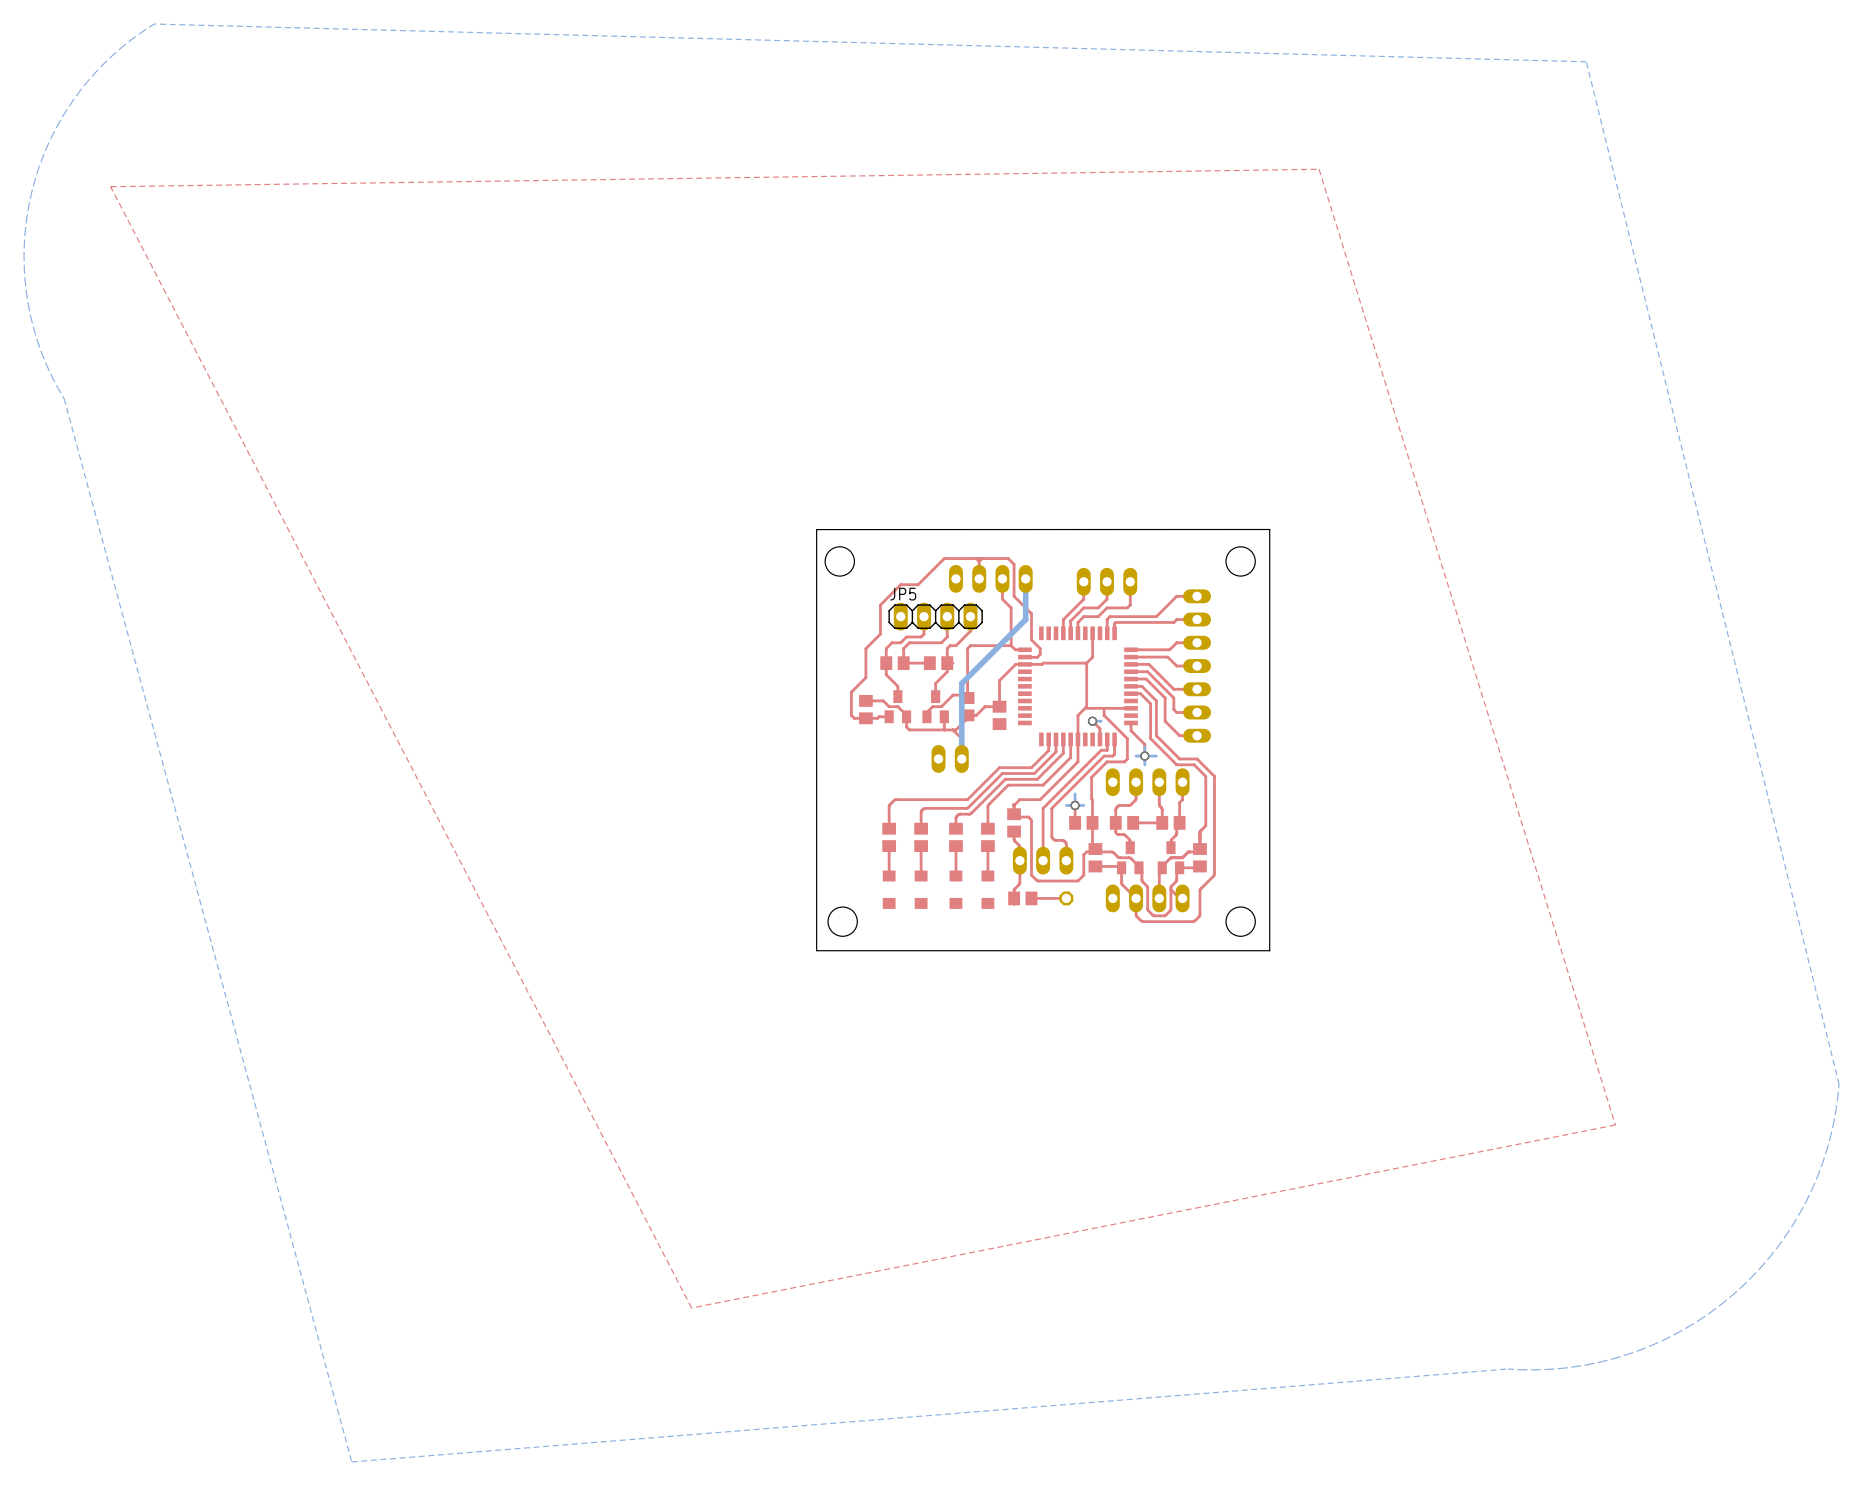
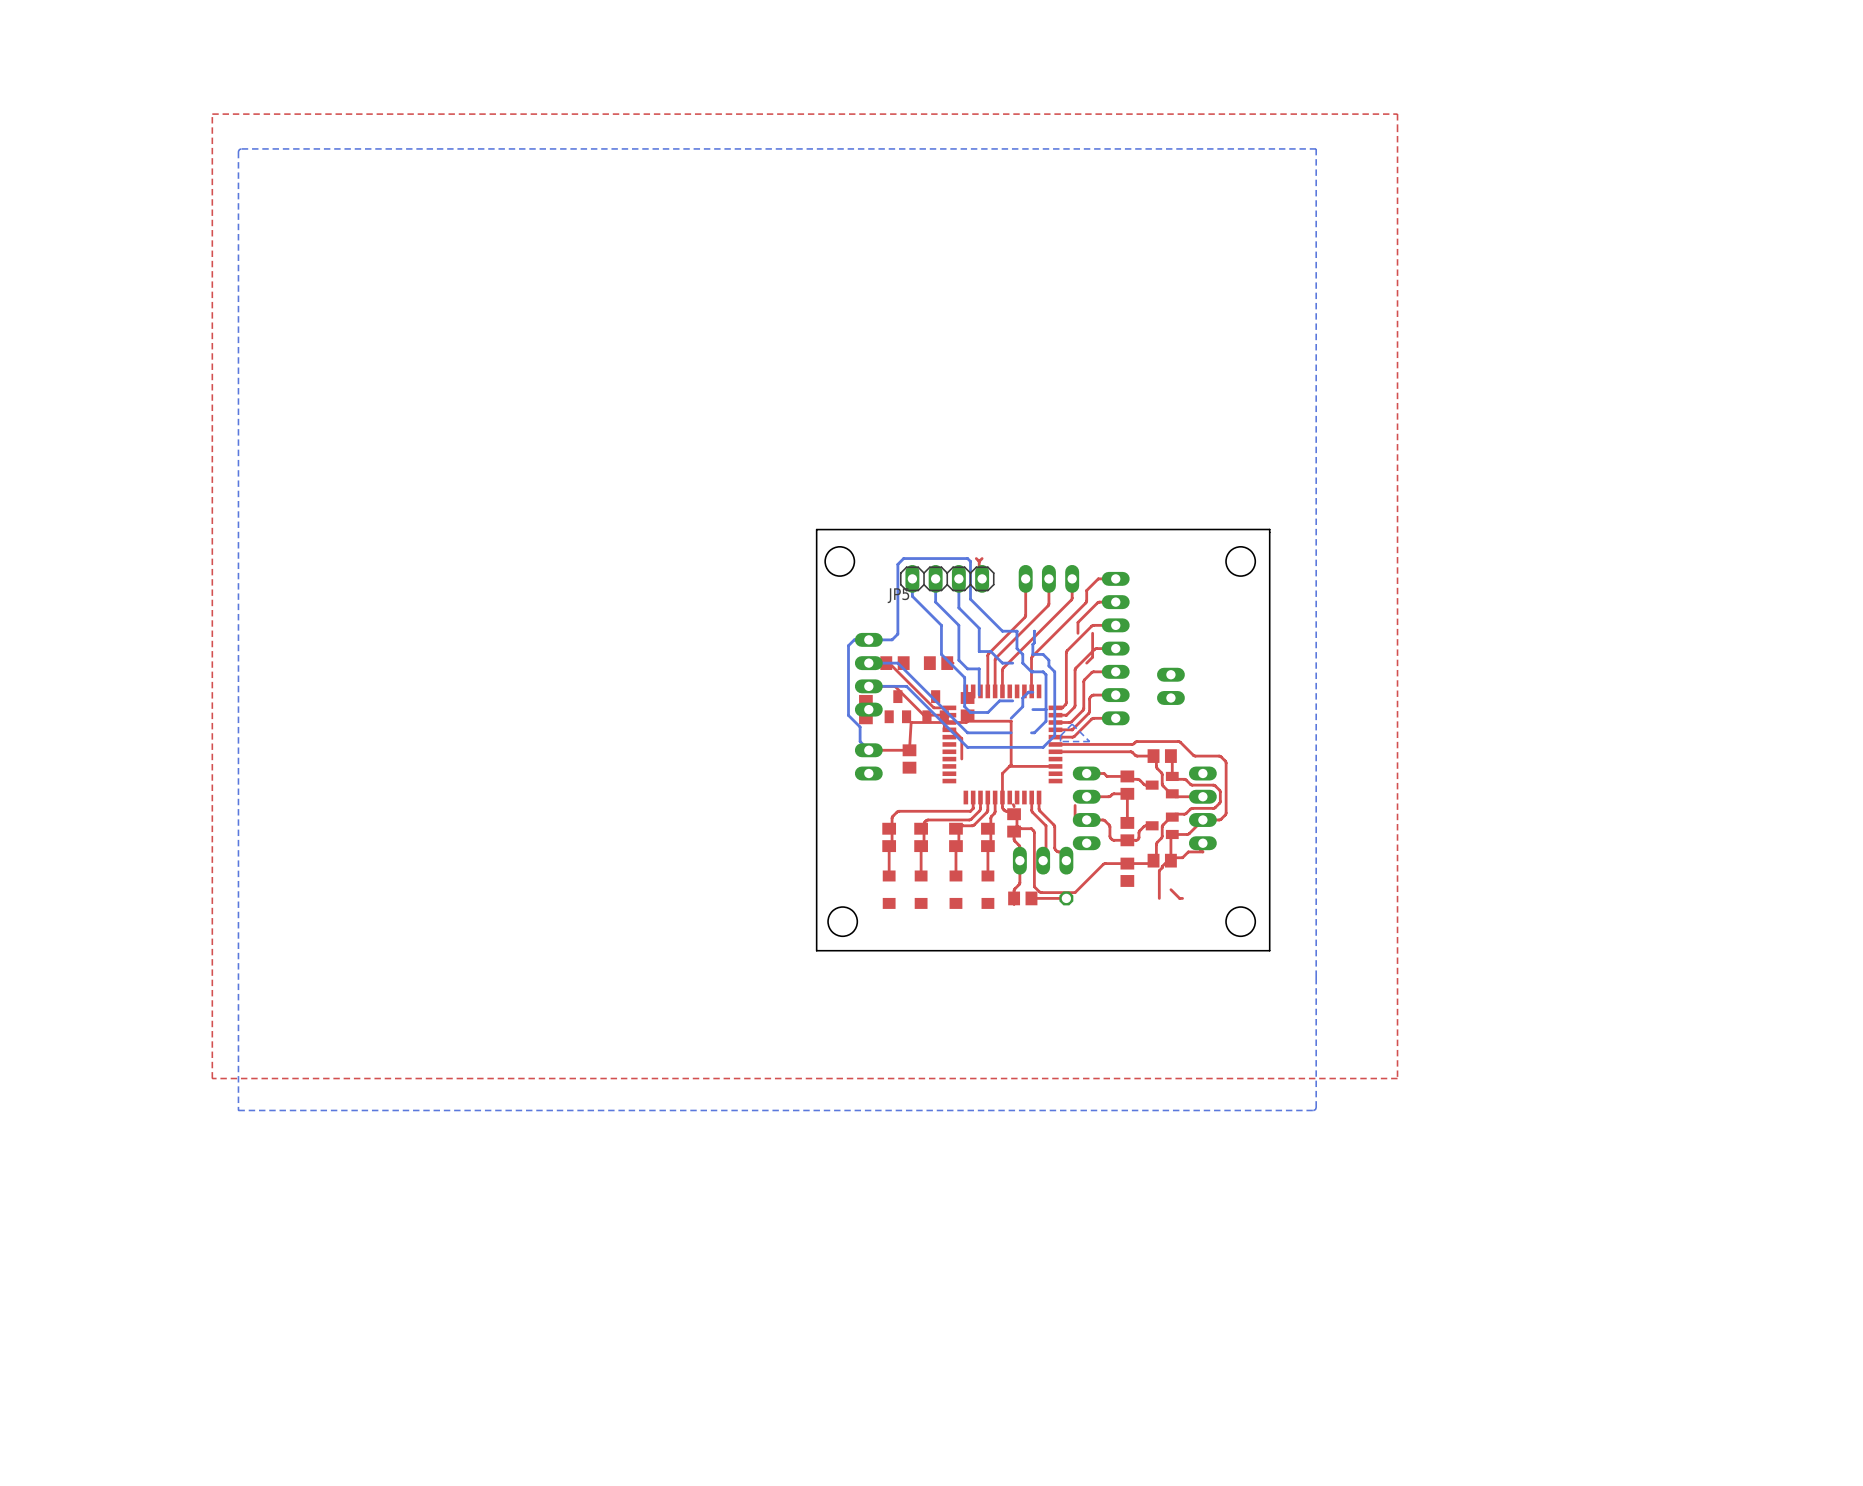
bottom zone outline: (154, 24) (1586, 61) (1839, 1084) (1833, 1124) (1822, 1163) (1806, 1200) (1778, 1246) (1742, 1286) (1722, 1303) (1688, 1326) (1652, 1344) (1627, 1354) (1575, 1366) (1534, 1369) (1507, 1369) (351, 1461) (64, 398) (41, 353) (30, 317) (26, 292) (24, 255) (28, 205) (38, 168) (53, 133) (72, 101) (96, 71) (123, 45) (154, 24) -> none
bottom zone outline: none -> (1316, 148) (1315, 1109) (238, 1110) (239, 149) (1316, 148)
top zone outline: (1319, 169) (1615, 1125) (691, 1308) (110, 186) (1319, 169) -> (1397, 114) (1397, 1078) (212, 1078) (212, 114) (1397, 114)
bottom track: none -> (912, 578) (912, 596) (941, 625) (941, 654) (964, 677) (964, 706) (970, 712) (987, 712) (999, 700) (1012, 700)
bottom track: none -> (935, 578) (935, 602) (958, 625) (958, 660) (967, 668) (979, 668) (979, 695)
bottom track: none -> (958, 578) (958, 607) (979, 628) (979, 651) (990, 651) (1002, 663) (1012, 663)
part: (990, 578) -> none
top track: (1002, 578) (1002, 599) (1011, 607) (1011, 645) -> none
top track: none -> (1025, 578) (1025, 616) (988, 654) (987, 691)
bottom track: (1025, 578) (1025, 619) (961, 683) (961, 758) -> none
top track: none -> (1048, 578) (1048, 605) (995, 658) (995, 691)
top track: none -> (1072, 578) (1071, 599) (1002, 668) (1002, 691)
top track: none -> (1115, 578) (1098, 578) (1086, 590) (1086, 602) (1032, 656) (1031, 691)
top track: (1083, 581) (1083, 599) (1063, 619) (1063, 633) -> none
top track: (1107, 581) (1107, 599) (1098, 607) (1083, 607) (1070, 621) (1070, 633) -> none
part position: (1107, 581) -> (1048, 578)
top track: (1130, 581) (1130, 605) (1127, 607) (1107, 607) (1098, 616) (1083, 616) -> (1115, 602) (1098, 602) (1083, 616)
top track: (1197, 596) (1176, 596) (1156, 616) (1109, 616) (1107, 619) (1107, 633) -> none
top track: (924, 616) (924, 634) (921, 636) (906, 636) (900, 642) (892, 642) (886, 648) (886, 674) (897, 686) (897, 696) -> none
JP5 position: (935, 616) -> (947, 578)
top track: (947, 616) (947, 636) (941, 642) (909, 642) (903, 648) (903, 663) (929, 663) -> none
top track: (970, 616) (970, 631) (955, 645) (950, 645) (947, 648) (947, 671) (935, 683) (935, 696) -> none
top track: (1197, 619) (1176, 619) (1173, 622) (1115, 622) (1114, 633) -> none
top track: none -> (1115, 625) (1092, 625) (1066, 650) (1066, 703) (1062, 707) (1055, 707)
bottom track: none -> (1034, 631) (1032, 654) (1043, 654) (1048, 660) (1048, 666) (1054, 671) (1054, 735) (1043, 747) (967, 747) (906, 686) (868, 686)
top track: (1197, 642) (1176, 642) (1169, 649) (1131, 649) -> none
top track: (1011, 645) (1015, 649) (1024, 649) -> none
top track: (1011, 645) (970, 645) (967, 648) (967, 695) -> none
top track: none -> (1115, 648) (1095, 648) (1075, 668) (1074, 706) (1066, 715) (1055, 715)
top track: (1024, 657) (1037, 657) (1040, 654) (1040, 648) (1031, 639) (1031, 613) (1014, 596) (1014, 564) (1008, 558) (944, 558) (918, 584) (900, 584) (880, 605) (880, 634) (865, 648) (865, 677) (851, 692) (851, 715) (854, 718) (889, 716) -> none
top track: (1131, 657) (1167, 657) (1176, 666) (1197, 666) -> none
top track: none -> (868, 663) (889, 663) (933, 707) (949, 707)
bottom track: none -> (868, 663) (897, 663) (967, 732) (1011, 732)
top track: (1131, 664) (1148, 664) (1173, 689) (1197, 689) -> none
part position: (1197, 666) -> (1115, 648)
top track: (1131, 671) (1147, 671) (1173, 697) (1173, 709) (1176, 712) (1197, 712) -> none
part: none -> (868, 674)
top track: (1131, 679) (1146, 679) (1165, 697) (1165, 721) (1179, 735) (1197, 735) -> none
top track: none -> (868, 686) (894, 686) (923, 715) (949, 715)
part position: (1077, 686) -> (1002, 744)
top track: (1131, 686) (1141, 686) (1156, 700) (1156, 735) (1179, 758) (1197, 758) (1214, 776) (1214, 874) (1200, 889) (1199, 915) (1194, 921) (1142, 921) (1136, 915) (1136, 898) (1121, 883) (1121, 867) (1095, 866) -> none
part: none -> (1170, 686)
bottom track: none -> (1028, 692) (1022, 697) (1022, 706) (1011, 718)
bottom track: none -> (1032, 692) (1028, 692)
top track: (1131, 693) (1140, 693) (1150, 703) (1150, 738) (1176, 764) (1194, 764) (1205, 776) (1205, 825) (1199, 831) (1199, 851) -> none
top track: (967, 695) (953, 695) (941, 706) (932, 706) (926, 712) -> none
top track: none -> (1115, 695) (1092, 695) (1089, 698) (1089, 712) (1072, 729) (1055, 729)
top track: (865, 700) (883, 700) (889, 706) (897, 706) (906, 715) (906, 727) (909, 729) (955, 729) (967, 718) (967, 715) (976, 715) (985, 706) (999, 706) (999, 680) (1015, 664) (1086, 663) (1086, 706) (1082, 710) -> (1115, 671) (1092, 671) (1084, 679) (1082, 710)
top track: (1104, 708) (1104, 715) (1127, 738) (1127, 758) (1124, 761) (1107, 761) (1091, 777) (1092, 846) (1098, 851) (1112, 851) (1119, 857) (1130, 857) (1138, 866) (1141, 870) (1142, 880) (1147, 887) (1147, 909) (1154, 915) (1164, 915) (1170, 910) (1170, 887) (1176, 880) (1176, 870) (1179, 867) (1204, 867) (1199, 866) -> none
top track: (1131, 708) (1085, 708) -> (1055, 766) (1009, 766)
bottom track: none -> (1046, 709) (1032, 709)
part: (999, 715) -> none
top track: (1077, 715) (1077, 761) (1040, 799) (1019, 799) (1014, 805) (1014, 814) (1017, 817) (1028, 817) (1031, 820) (1031, 875) (1037, 880) (1077, 880) (1083, 875) (1083, 854) (1086, 851) (1098, 851) -> (1077, 715) (1070, 722) (1055, 722)
top track: none -> (1115, 718) (1092, 718) (1073, 736) (1055, 737)
top track: (1092, 721) (1099, 728) (1099, 739) -> none
via: (1092, 721) -> none
bottom track: (1101, 721) (1092, 721) -> none
top track: (1131, 722) (1131, 730) (1144, 744) (1144, 756) -> none
bottom zone outline: none -> (1072, 724) (1089, 741) (1060, 741) (1060, 735) (1072, 724)
bottom track: none -> (1031, 732) (1034, 732) (1046, 721) (1046, 674) (1043, 671) (1031, 671) (1022, 663) (1022, 654) (1016, 648) (1016, 631) (1002, 631) (970, 599) (970, 561) (967, 558) (903, 558) (897, 564) (897, 634) (892, 639) (854, 639) (848, 645) (848, 715) (860, 727) (860, 741) (868, 750)
top track: (1048, 739) (1048, 750) (1031, 767) (999, 767) (967, 799) (894, 800) (889, 806) (889, 828) -> none
top track: (1056, 739) (1056, 751) (1034, 773) (1002, 773) (967, 808) (924, 808) (921, 812) (921, 828) -> none
top track: (1063, 739) (1063, 753) (1037, 779) (1005, 779) (971, 813) (956, 816) (955, 828) -> none
top track: (1070, 739) (1070, 757) (1043, 785) (1008, 785) (988, 804) (987, 828) -> none
top track: (1107, 739) (1107, 750) (1101, 750) (1043, 808) (1043, 860) -> none
top track: (1114, 739) (1114, 754) (1104, 756) (1051, 808) (1051, 836) (1054, 840) (1063, 840) (1065, 842) (1066, 860) -> none
top track: none -> (1055, 744) (1131, 744) (1137, 741) (1178, 741) (1194, 755) (1219, 756) (1225, 761) (1225, 814) (1219, 819) (1202, 819) (1188, 834) (1172, 834) (1170, 860)
bottom track: (1144, 747) (1144, 764) -> none
top track: none -> (868, 750) (909, 750) (911, 722) (1011, 721) (1011, 764) (1002, 773) (1002, 793)
top track: none -> (1055, 751) (1130, 751) (1137, 756) (1153, 756) (1156, 753) (1156, 766) (1162, 773) (1162, 785) (1170, 793) (1175, 796) (1202, 796)
via: (1144, 756) -> none
bottom track: (1156, 756) (1136, 756) -> none
part: none -> (1162, 756)
top track: none -> (1170, 756) (1172, 751) (1172, 776) (1175, 779) (1185, 779) (1191, 785) (1214, 785) (1220, 791) (1220, 802) (1214, 808) (1192, 808) (1185, 813) (1175, 814) (1162, 825) (1162, 836) (1156, 844) (1156, 857) (1150, 863) (1127, 863)
part: none -> (909, 758)
part rotation: 0° (950, 758) -> 90° clockwise (868, 761)
part position: (950, 758) -> (868, 761)
top track: none -> (1086, 773) (1127, 776) (1130, 779) (1138, 779) (1144, 784) (1152, 785)
top track: (1136, 782) (1135, 800) (1130, 805) (1119, 805) (1115, 809) (1115, 832) (1124, 834) (1129, 839) (1130, 847) -> none
part: (1147, 782) -> none
top track: (1159, 782) (1159, 804) (1162, 809) (1162, 822) (1133, 822) -> none
top track: (1182, 782) (1179, 822) (1176, 825) (1176, 834) (1171, 840) (1170, 847) -> none
part: none -> (1127, 785)
part: none -> (1162, 785)
bottom track: (1075, 793) (1075, 805) -> none
top track: none -> (1086, 796) (1109, 796) (1113, 793) (1127, 793) (1127, 822)
top track: none -> (973, 797) (973, 808) (970, 811) (897, 811) (892, 817) (892, 840)
top track: none -> (980, 797) (980, 809) (970, 819) (926, 820) (924, 823) (924, 840)
top track: none -> (987, 797) (987, 811) (973, 825) (962, 825) (959, 827) (958, 840)
top track: none -> (995, 797) (995, 812) (990, 817) (990, 840)
top track: none -> (1002, 797) (1002, 808) (1011, 811) (1016, 816) (1016, 825) (1020, 828) (1031, 828) (1034, 831) (1034, 886) (1039, 892) (1075, 892) (1103, 863) (1127, 863)
top track: none -> (1031, 797) (1032, 811) (1046, 825) (1046, 872)
top track: none -> (1039, 797) (1039, 810) (1054, 826) (1055, 849) (1058, 851) (1066, 852) (1069, 854) (1069, 872)
via: (1075, 805) -> none
bottom track: (1083, 805) (1066, 805) -> none
part: none -> (1086, 808)
part: none -> (1202, 808)
top track: none -> (1086, 819) (1104, 820) (1109, 825) (1110, 836) (1113, 840) (1137, 840) (1139, 831) (1143, 826) (1152, 825)
part: (1083, 822) -> none
part rotation: 0° (1124, 822) -> 90° clockwise (1127, 831)
part: (1170, 822) -> none
part: none -> (1162, 825)
part: (1095, 857) -> none
part: (1130, 857) -> none
part: (1170, 857) -> none
part: (1199, 857) -> none
part: none -> (1162, 860)
part: none -> (1127, 872)
part: (1147, 898) -> none

